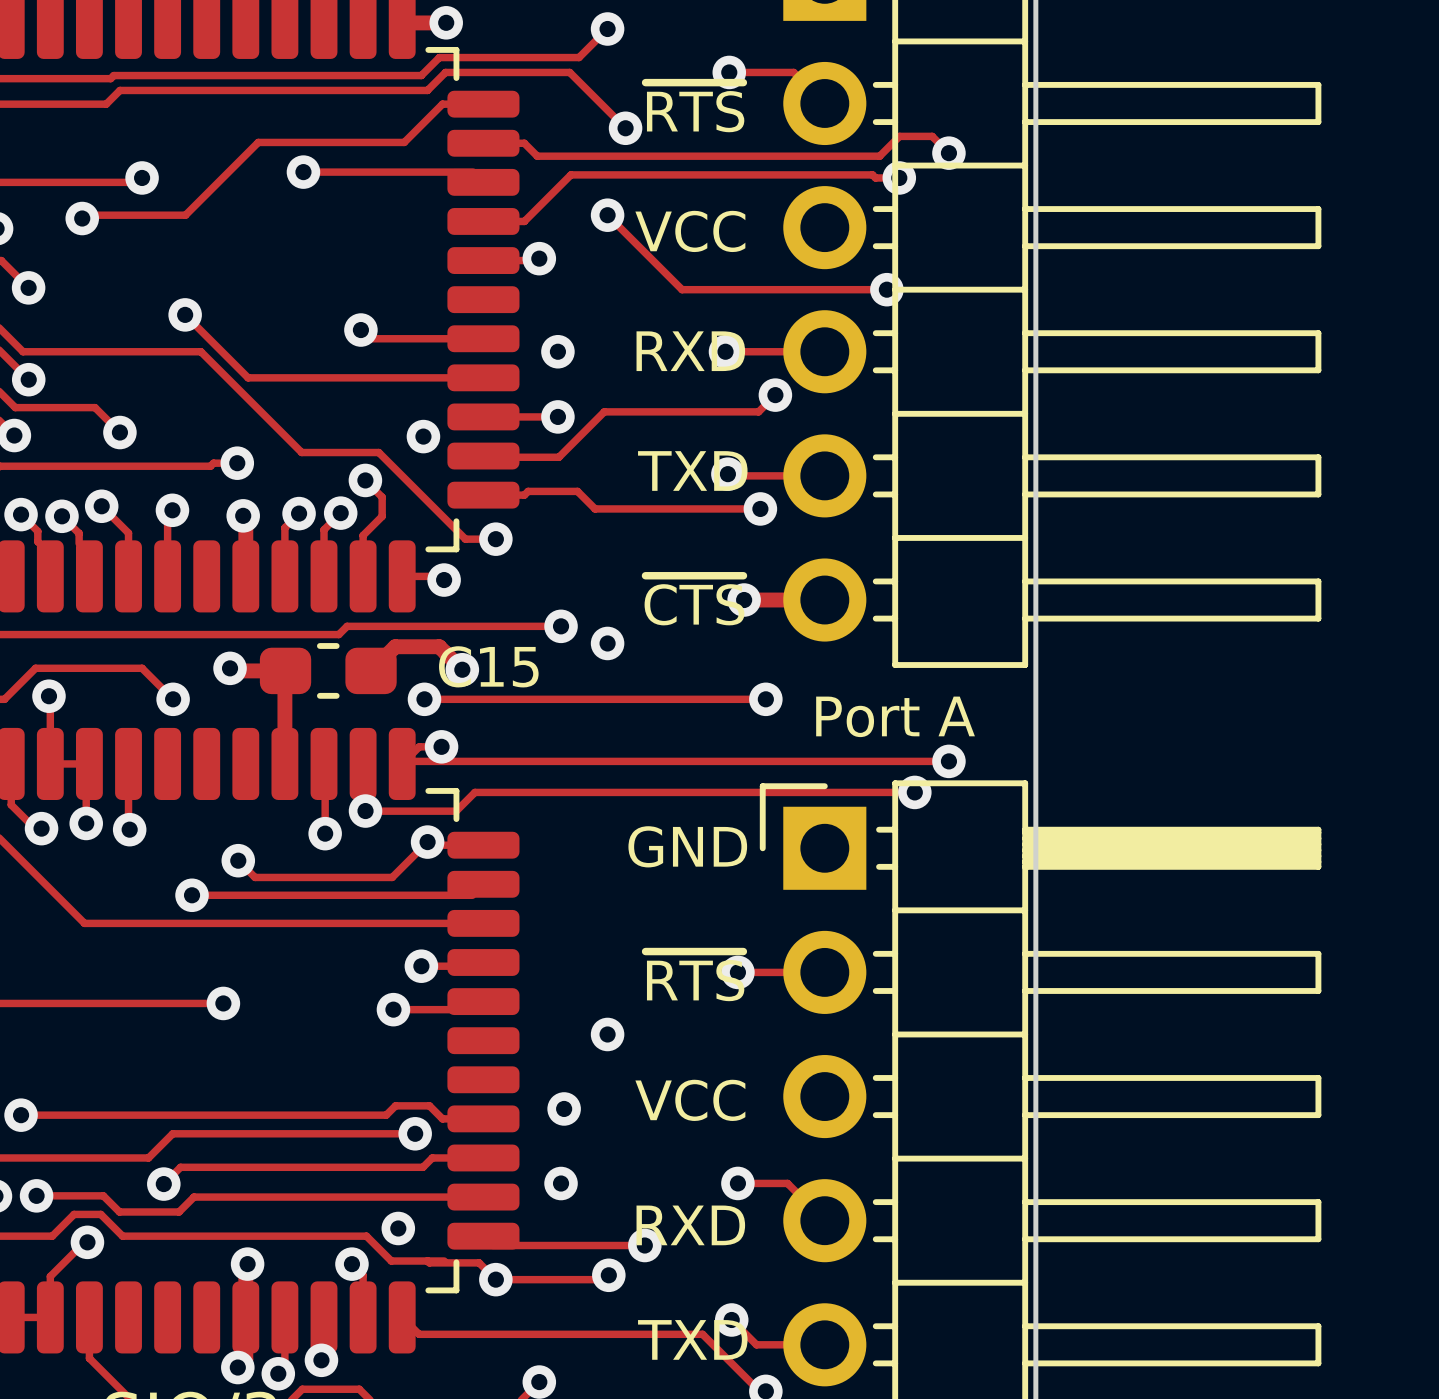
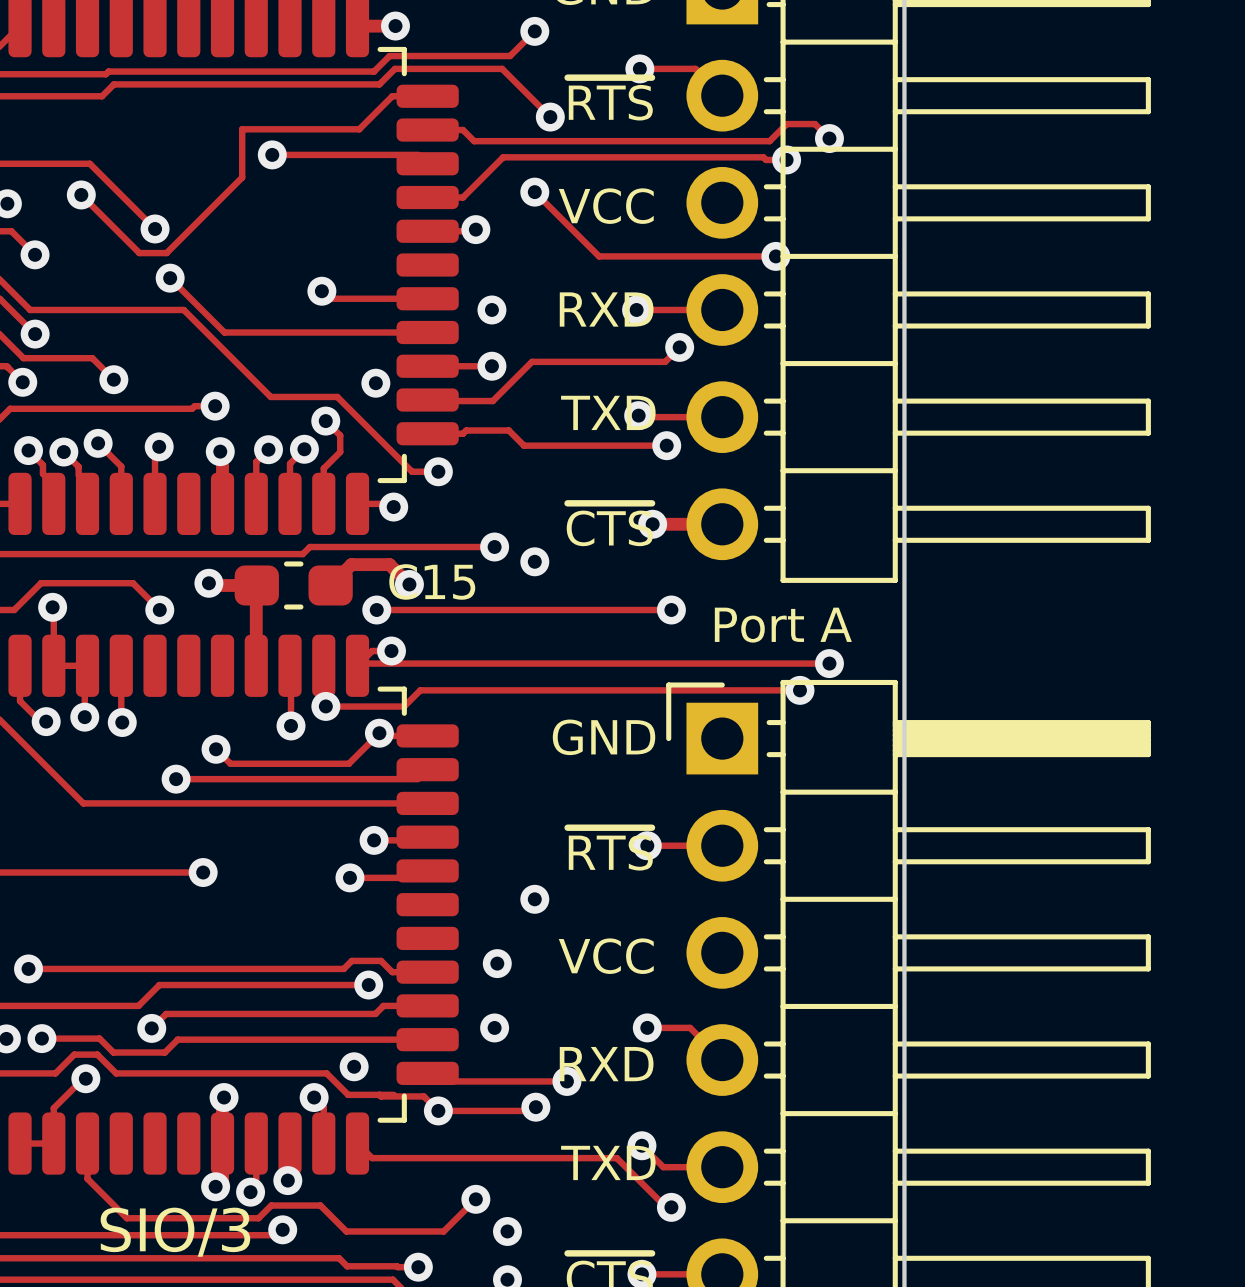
track: (268, 142) (258, 142) (185, 215) (85, 215) (82, 218) -> (242, 129) (242, 177) (166, 253) (139, 253) (81, 194)
track: (142, 177) (137, 182) (92, 182) -> (155, 228) (89, 163)
via position: (142, 177) -> (155, 228)

